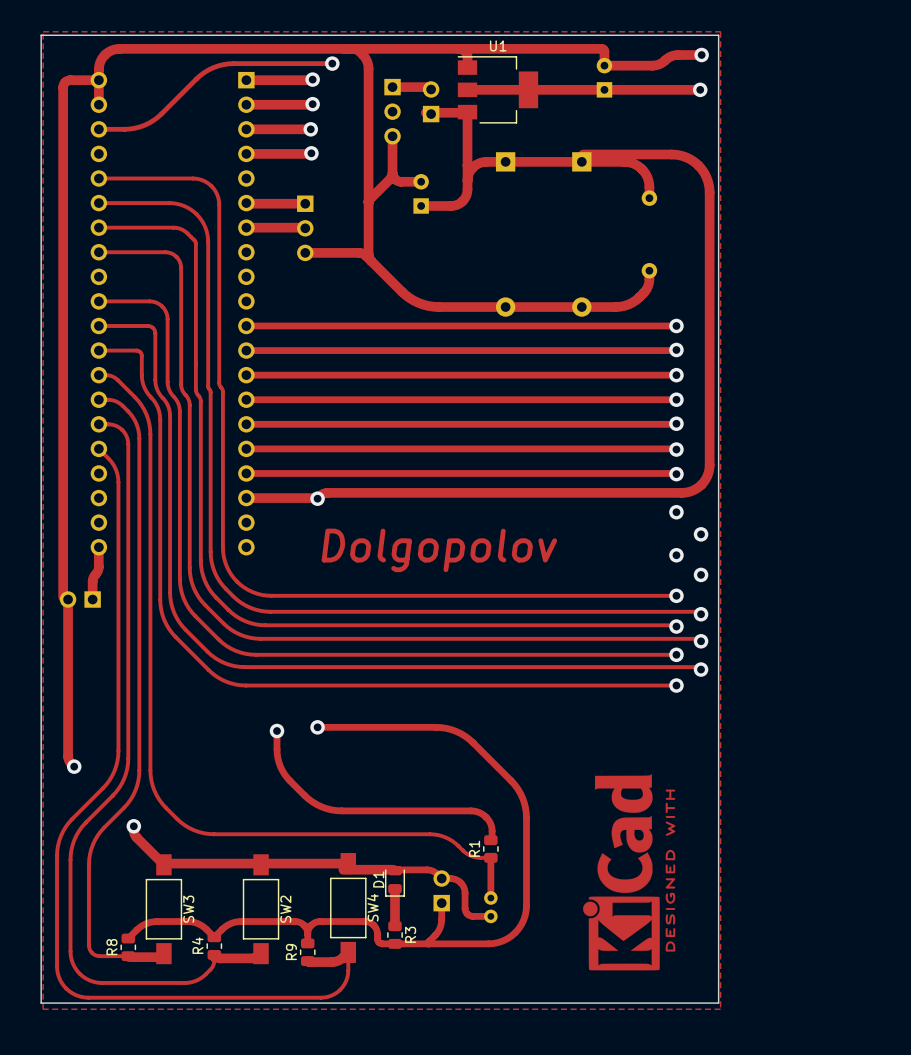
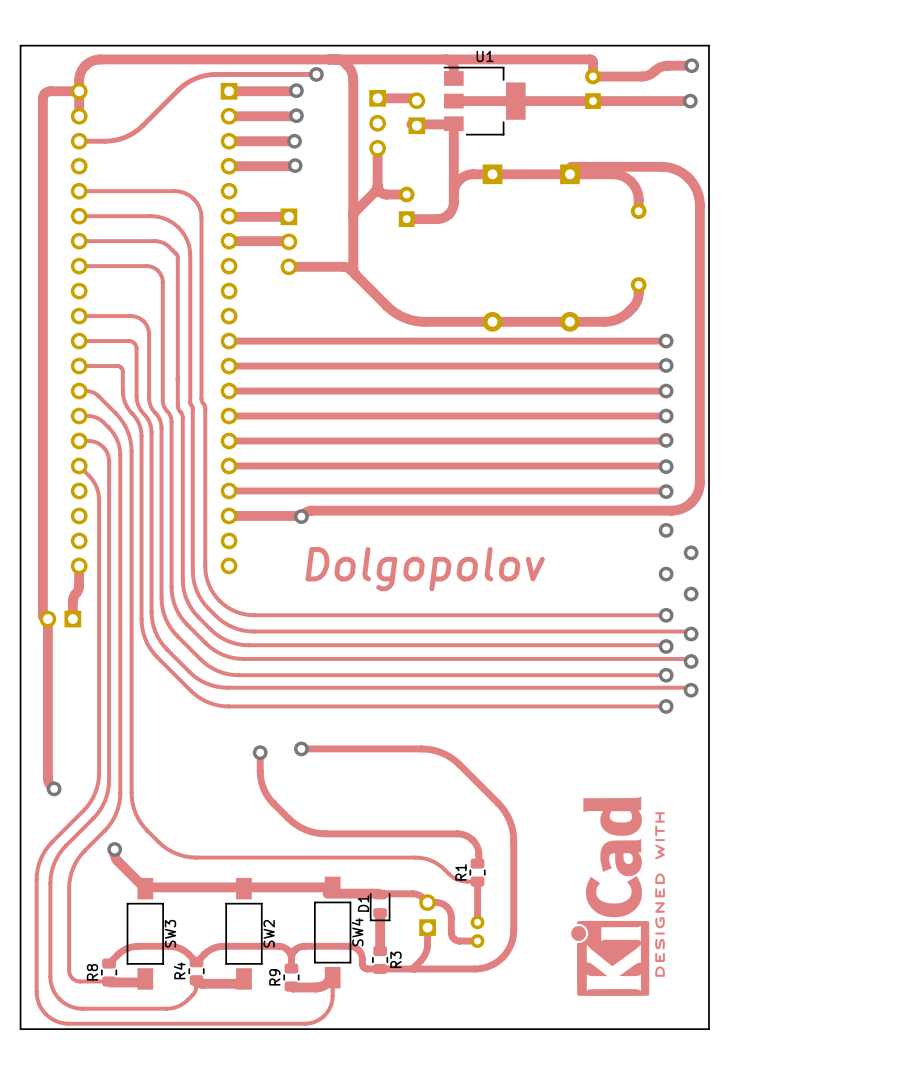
zone outline: (43, 31) (43, 1009) (720, 1009) (720, 31) (43, 31) -> none

